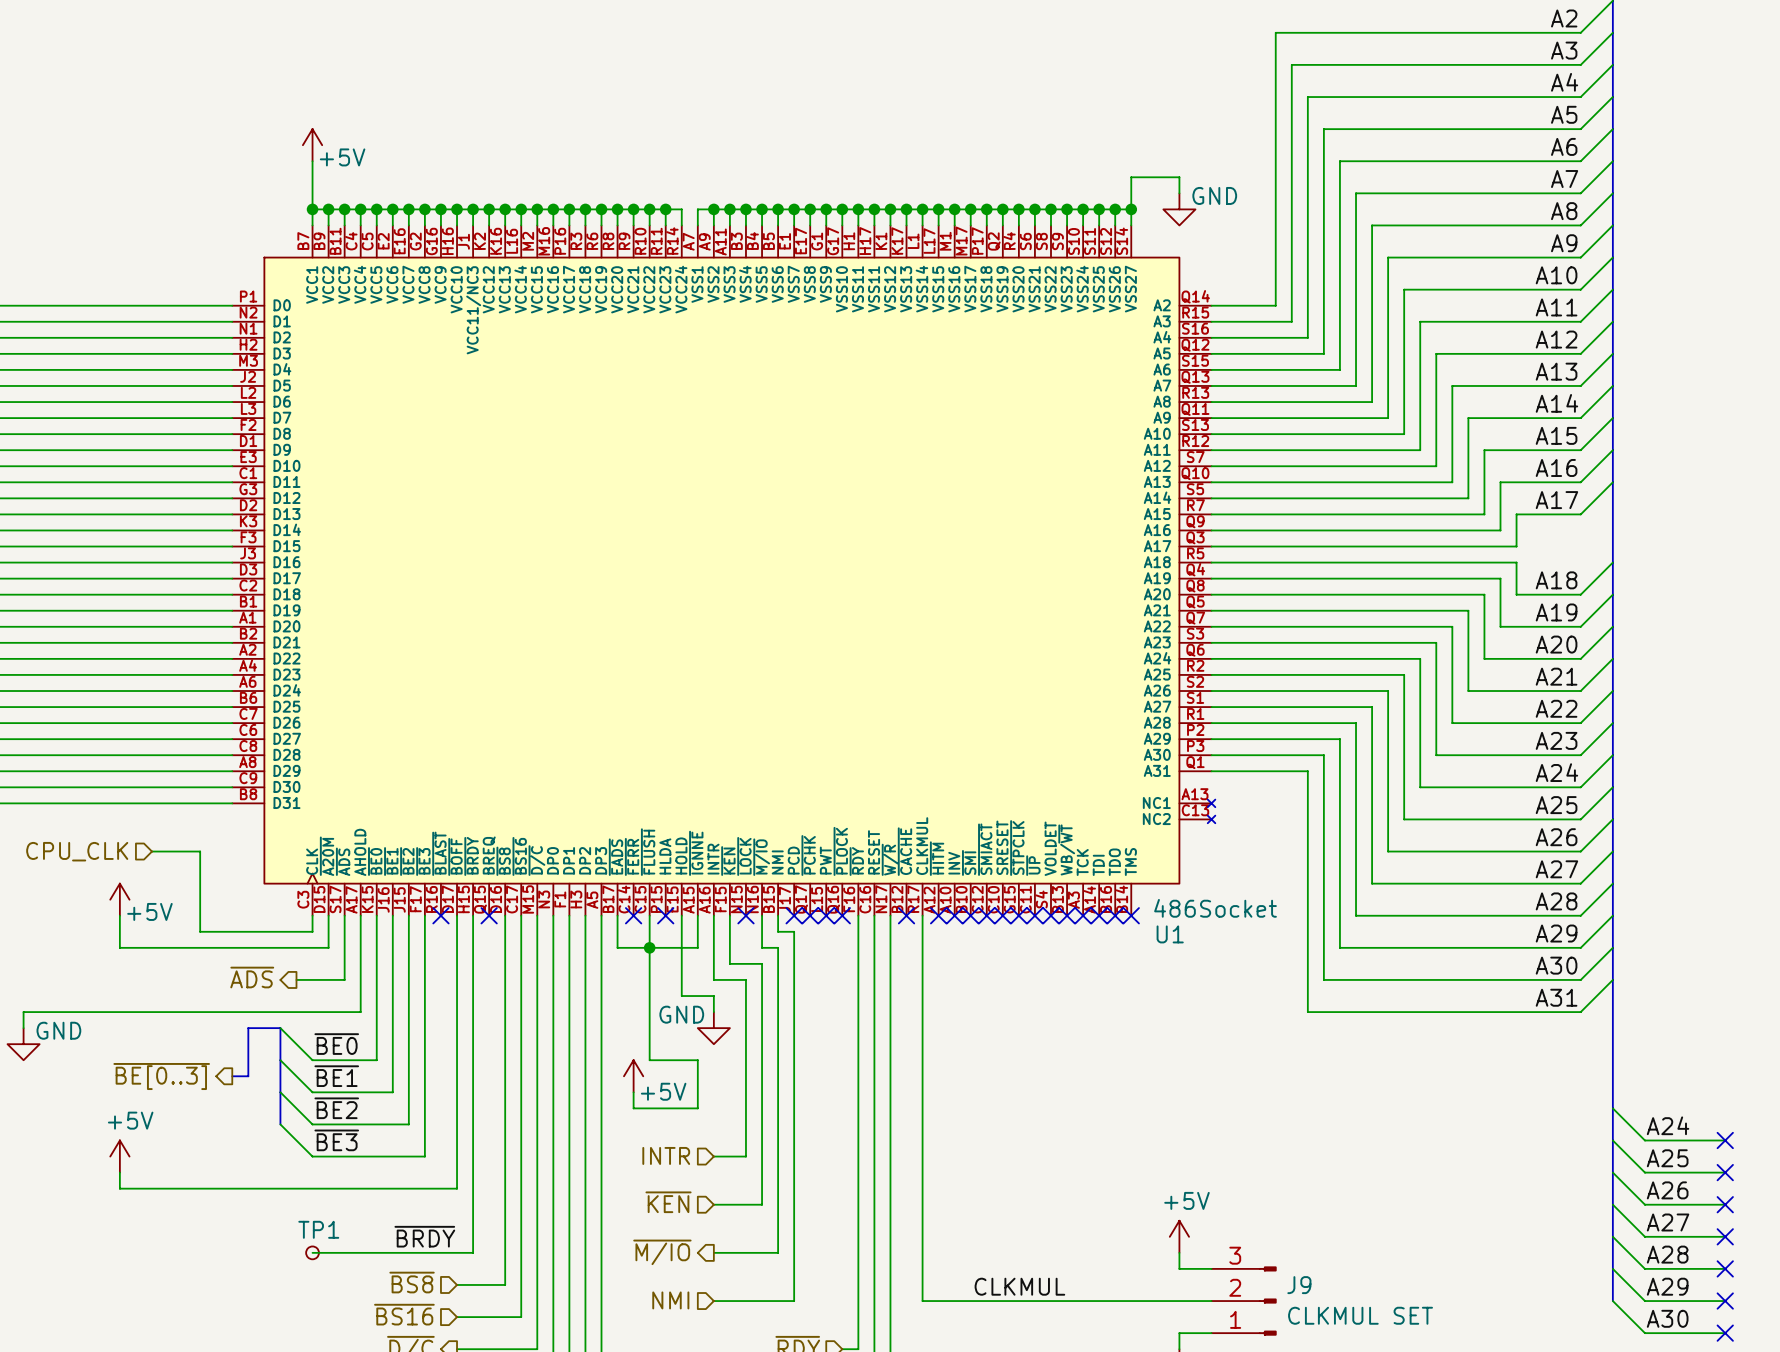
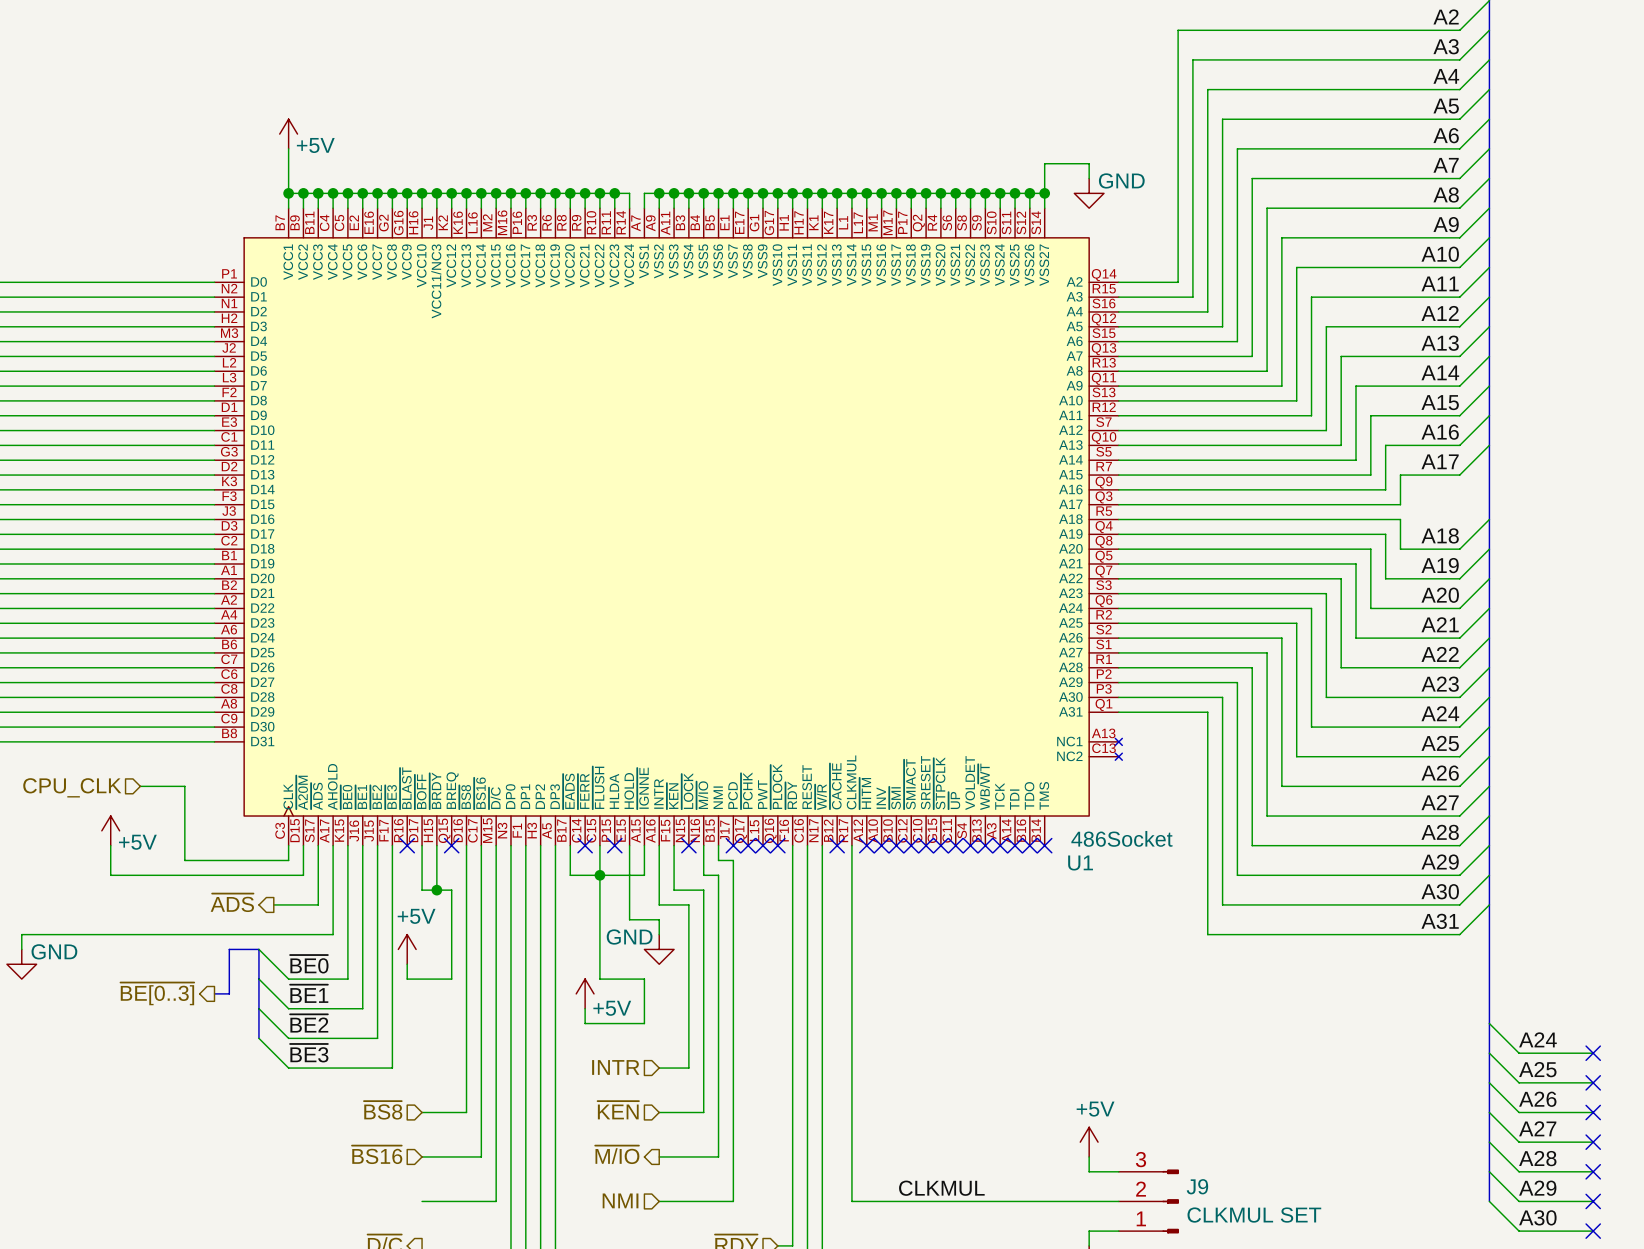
wire: (457, 963) (457, 1188) (119, 1188) (119, 1172) -> (422, 890) (451, 890) (451, 979) (407, 979) (407, 964)
wire: (473, 963) (473, 1252) -> none
junction: none -> (436, 890)
power symbol: none -> +5V (407, 949)
power symbol: +5V (119, 1156) -> none
wire: (505, 1204) (505, 1284) (457, 1284) -> (466, 1112) (422, 1112)
label: ~{BRDY} (424, 1236) -> none
wire: (312, 1252) (457, 1252) -> none
TP1: (312, 1252) -> none
wire: (521, 1252) (521, 1317) (457, 1317) -> (481, 1156) (436, 1156)
hierarchical label position: ~{BS8} (412, 1282) -> ~{BS8} (383, 1110)
wire: (537, 1301) (537, 1349) (457, 1349) -> (496, 1201) (422, 1201)
hierarchical label position: ~{BS16} (404, 1314) -> ~{BS16} (377, 1154)

